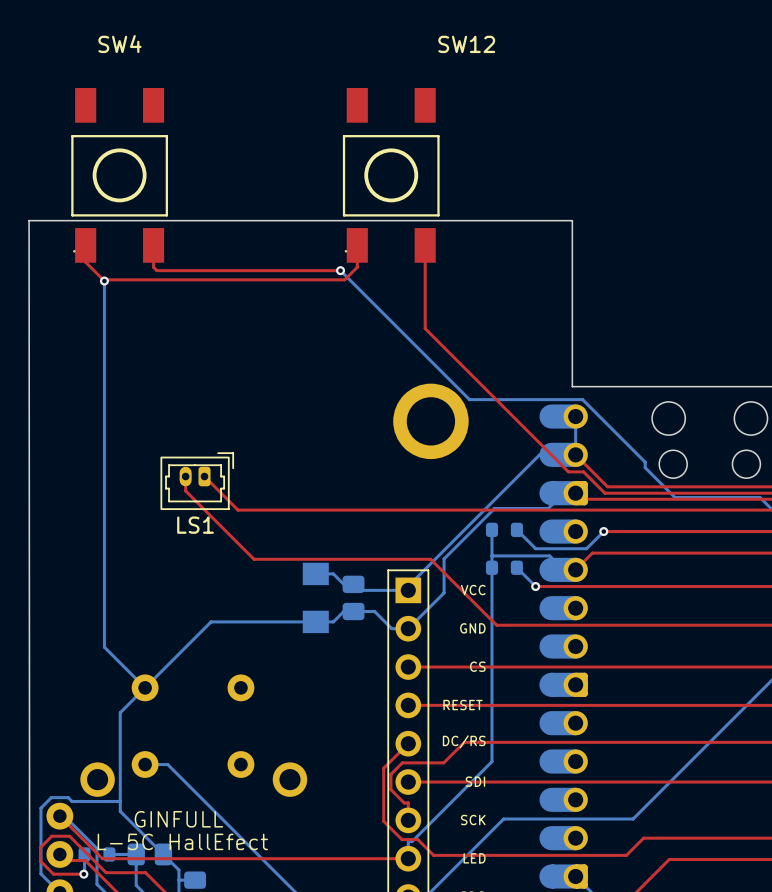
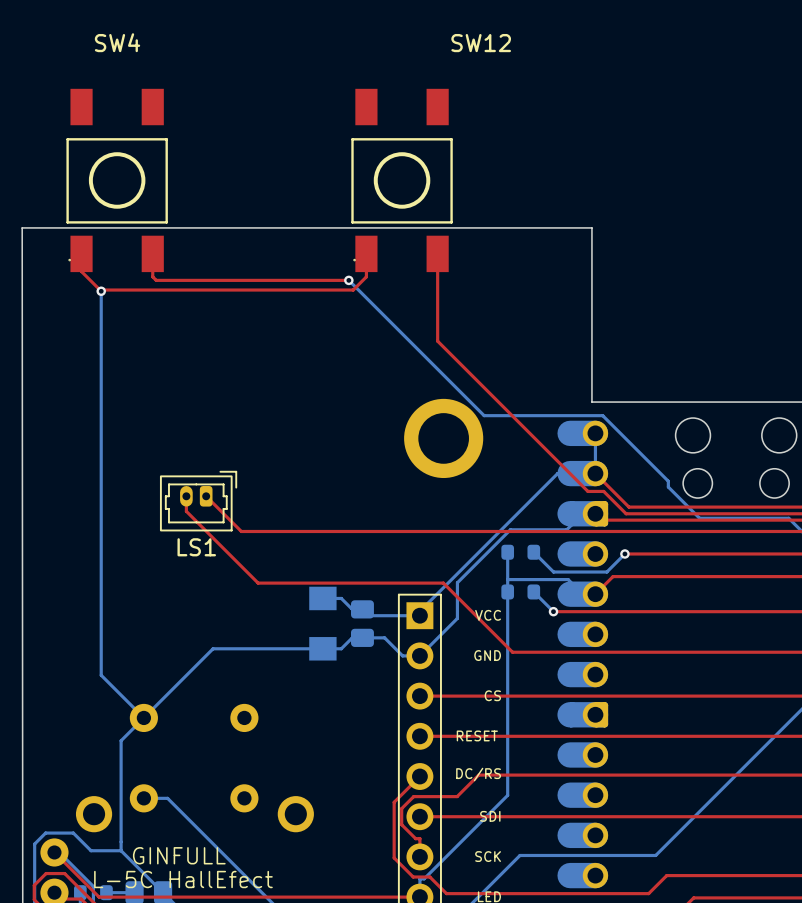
bottom track: (123, 709) (120, 712) (120, 811) (123, 814) -> (121, 740) (121, 850) (91, 850) (73, 833) (63, 833)
bottom track: (68, 797) (72, 801) (120, 801) -> none

